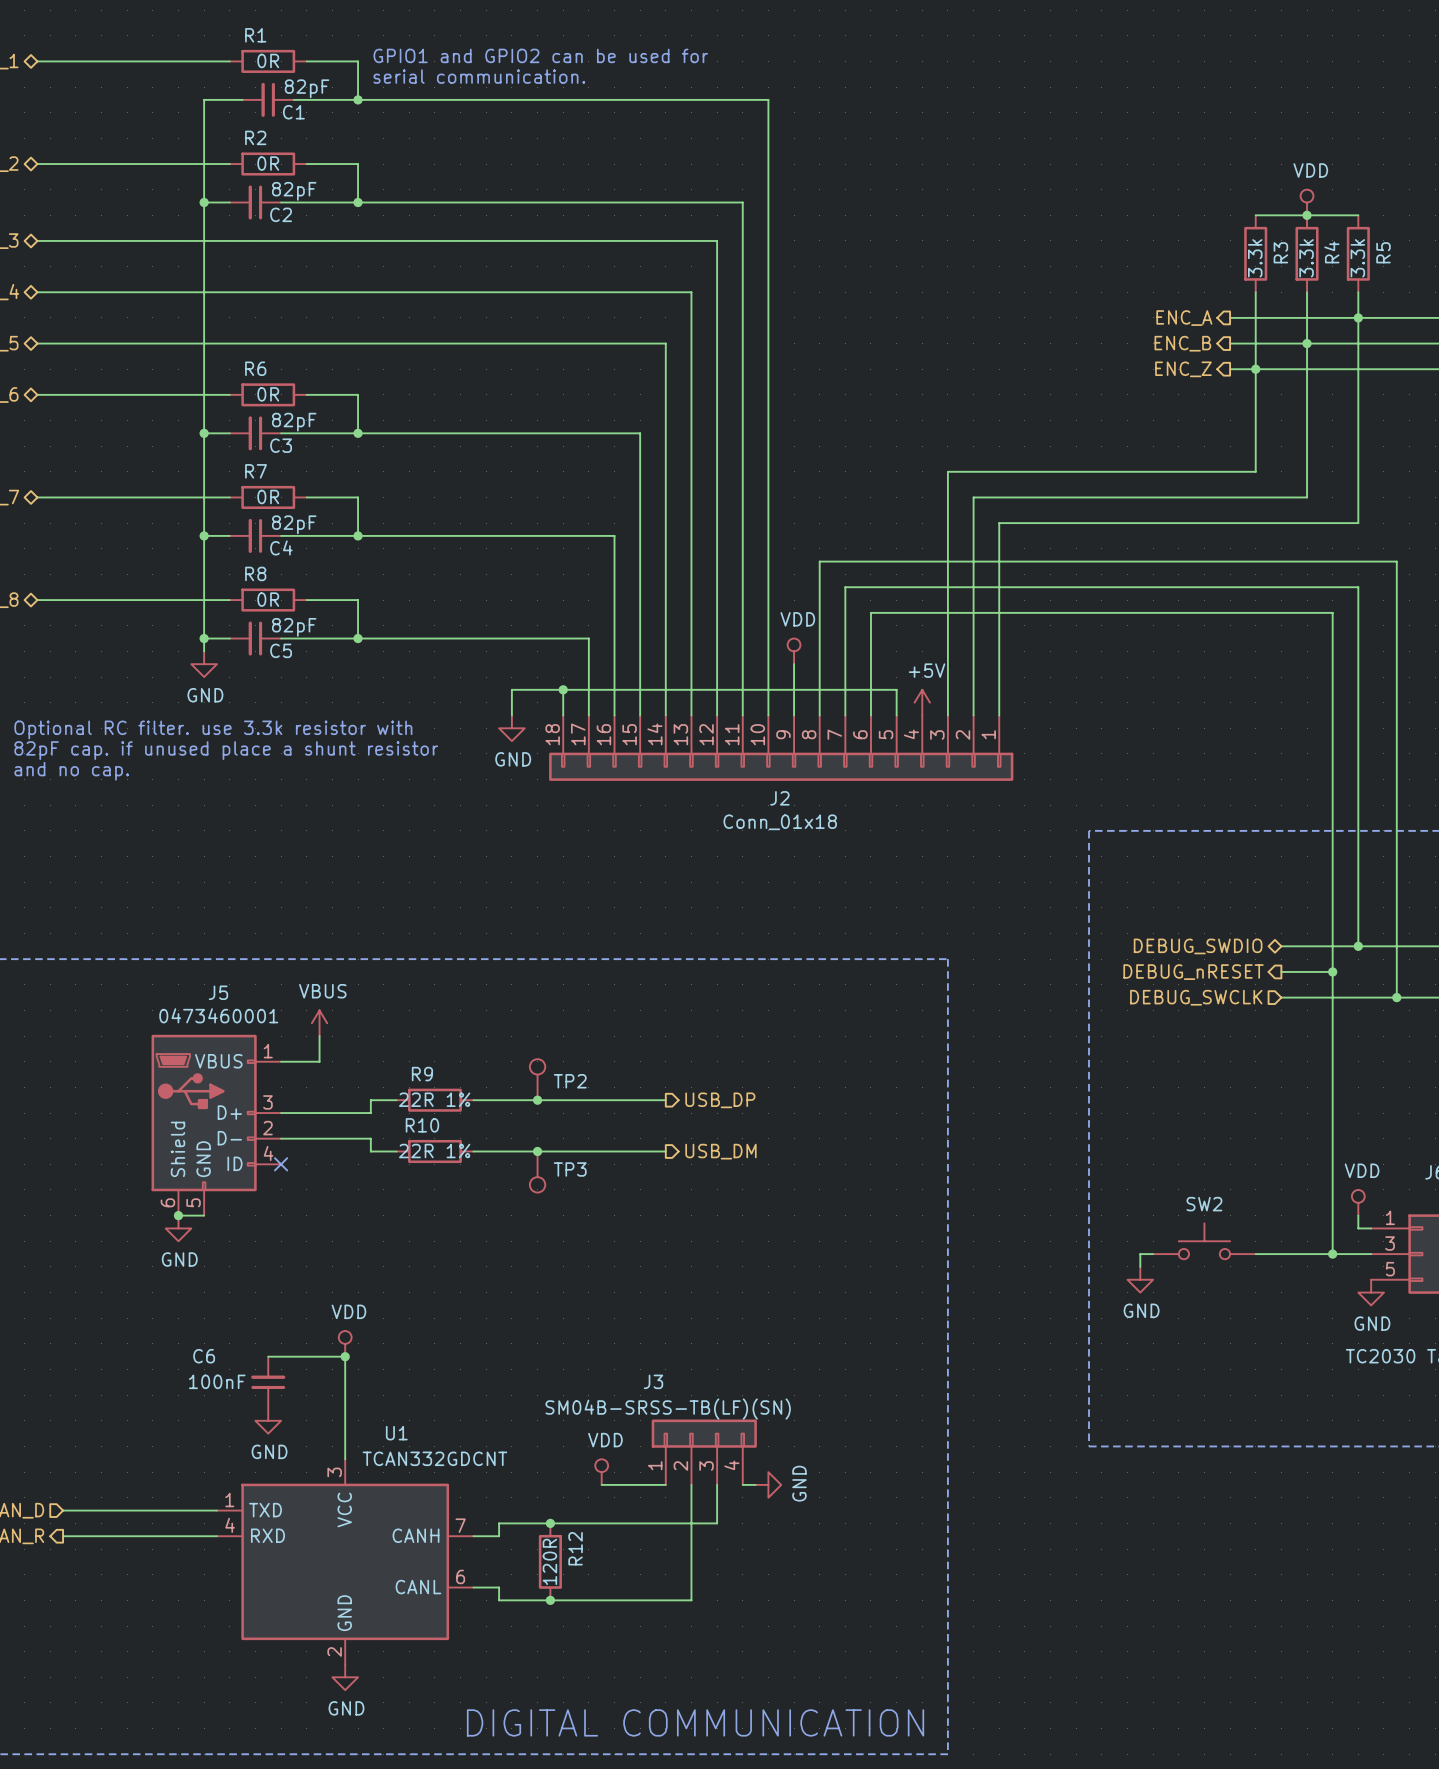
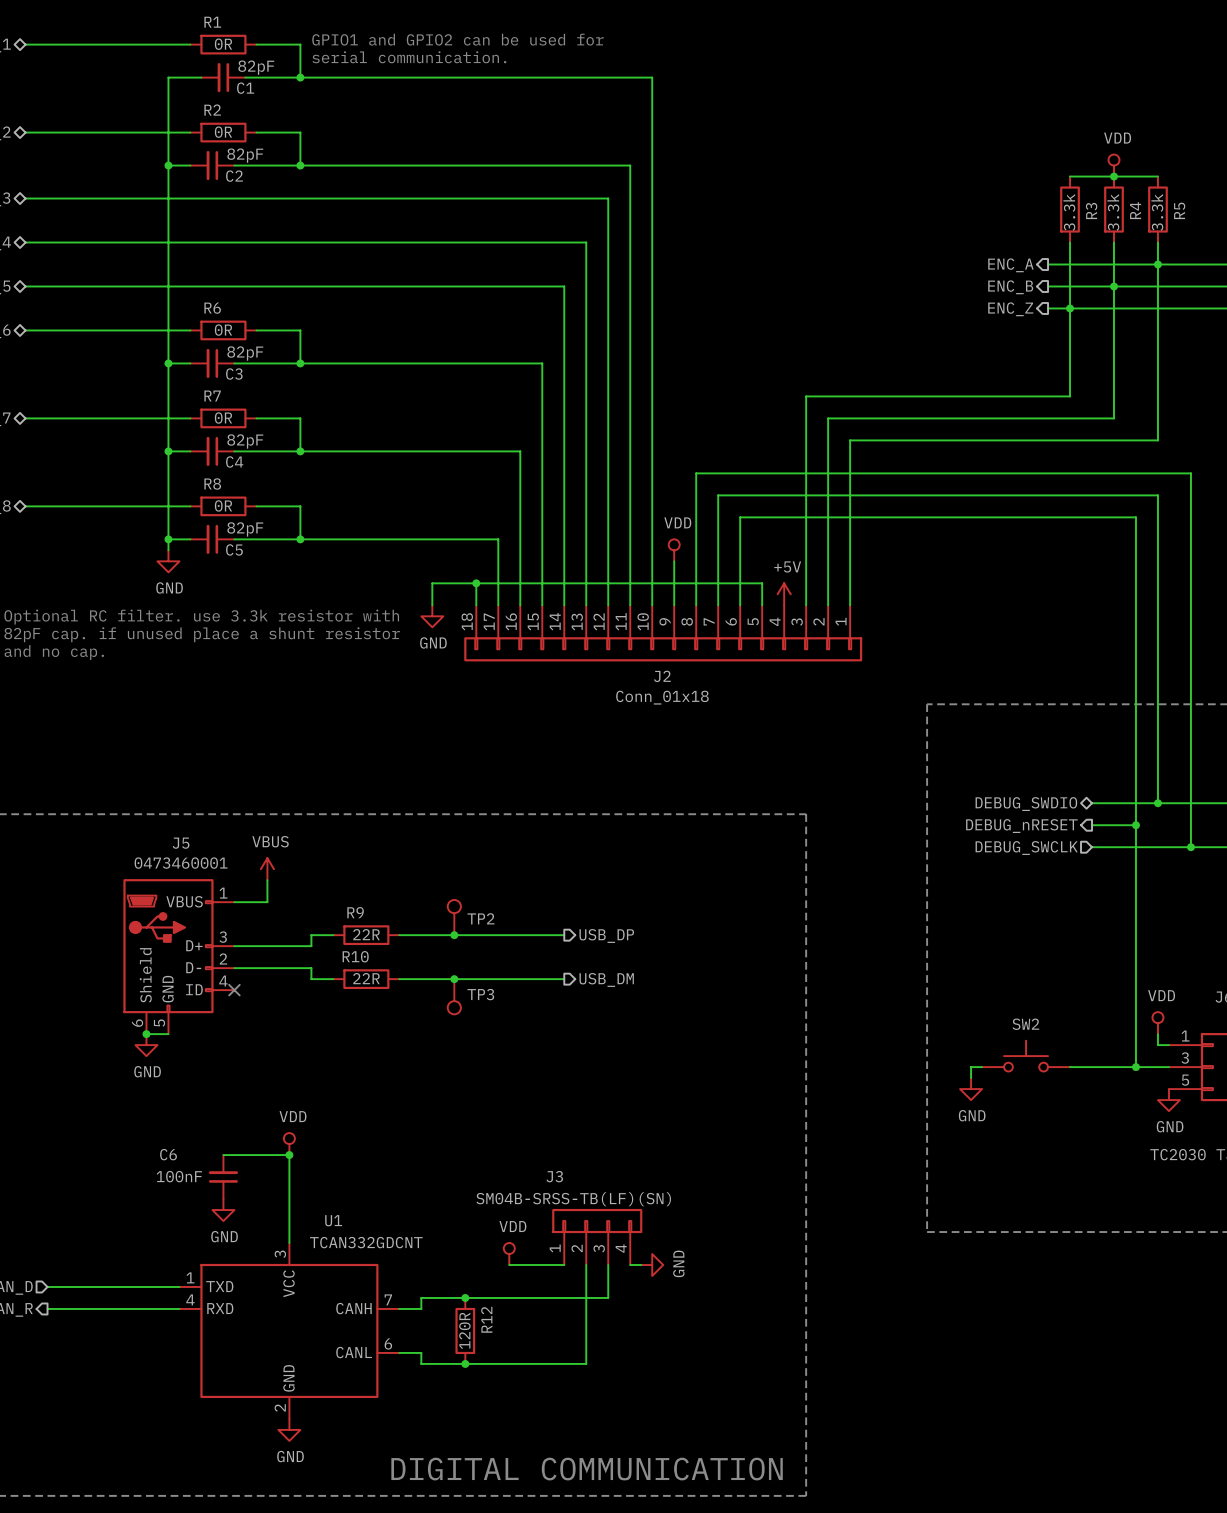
R9 value: 22R 1% (434, 1099) -> 22R (366, 934)
R10 value: 22R 1% (434, 1151) -> 22R (366, 978)

